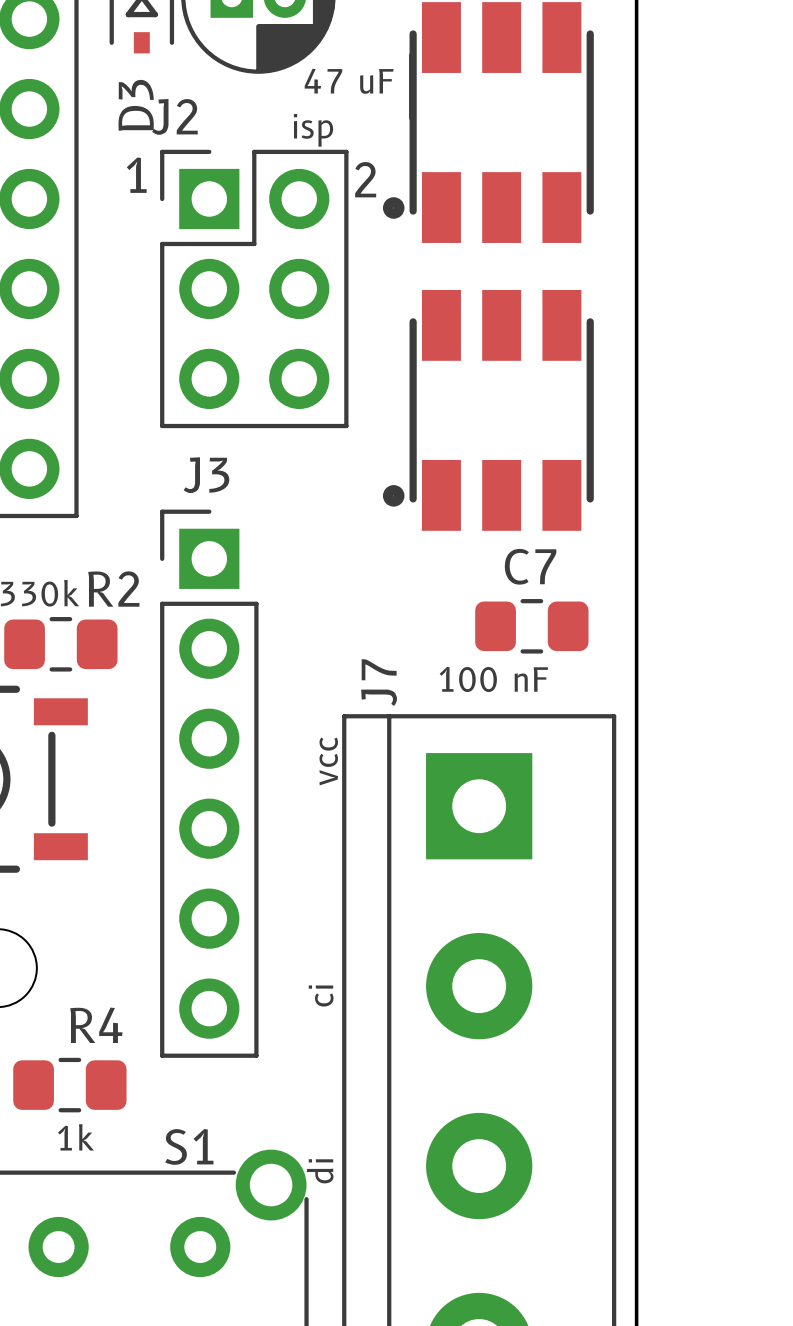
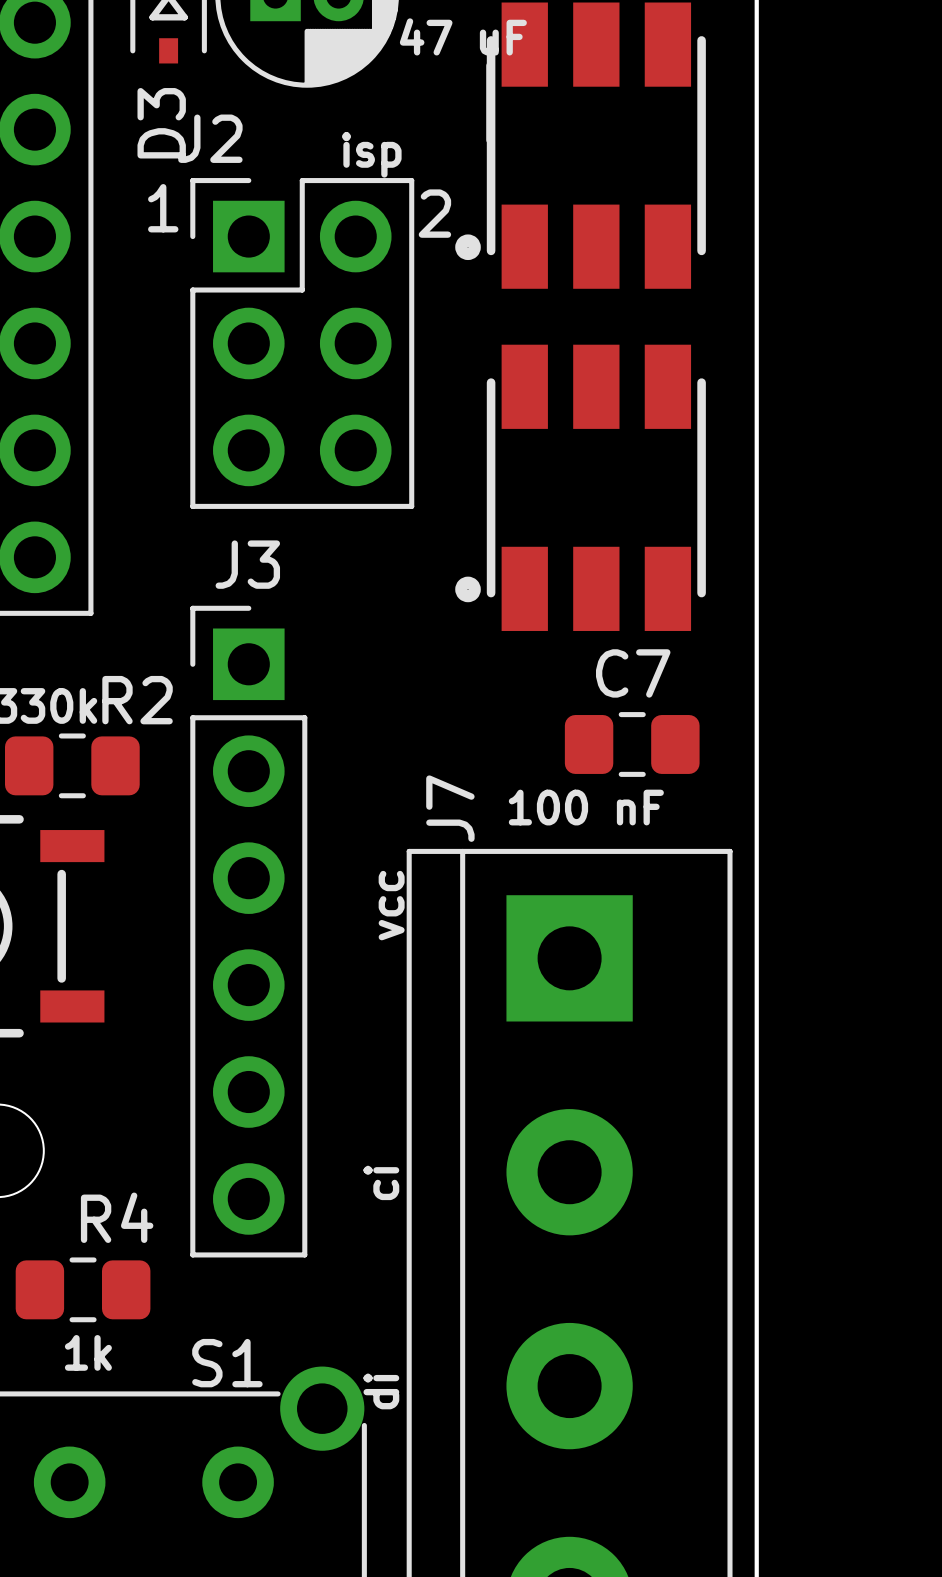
text position: 47 uF (349, 81) -> 47 uF (463, 36)

